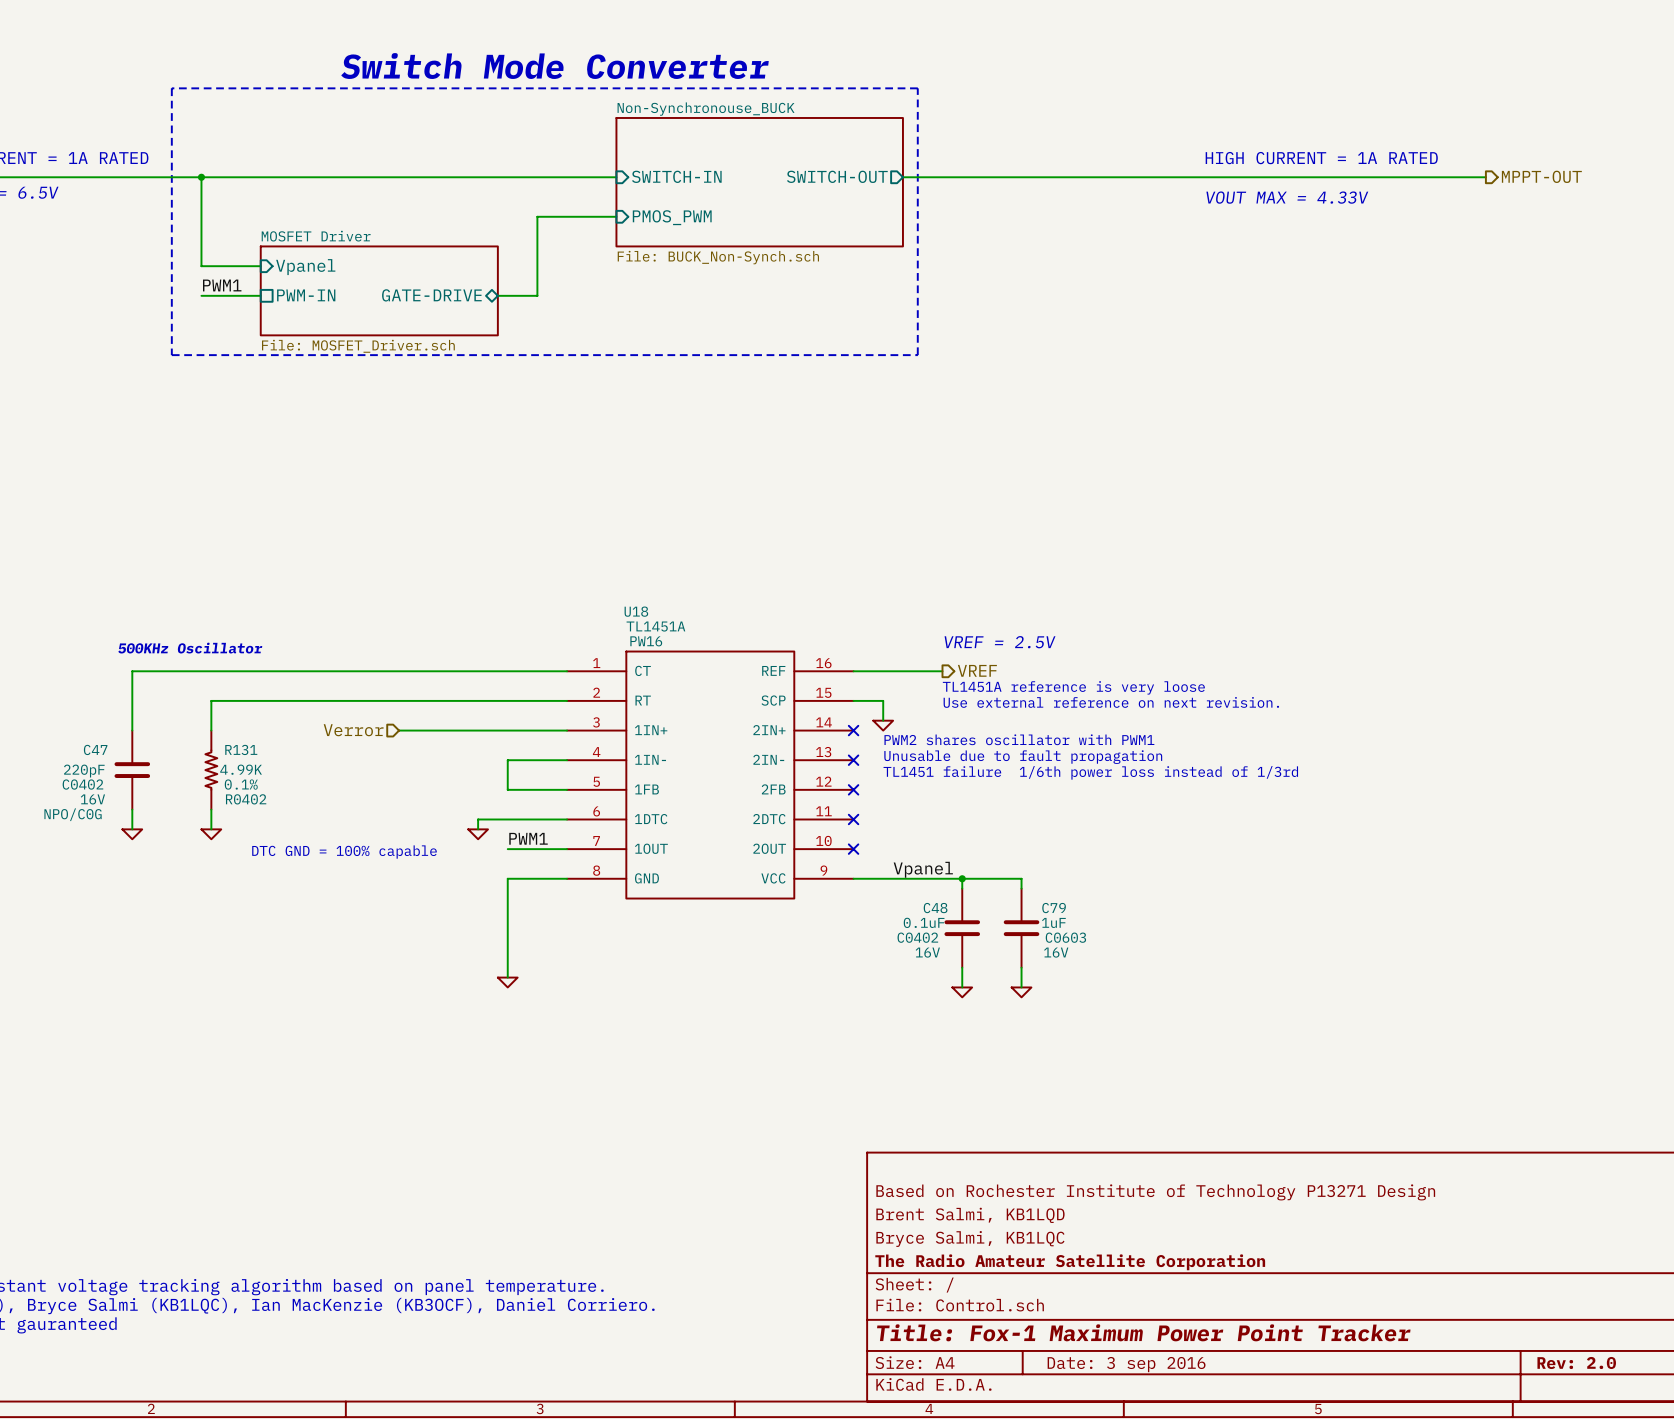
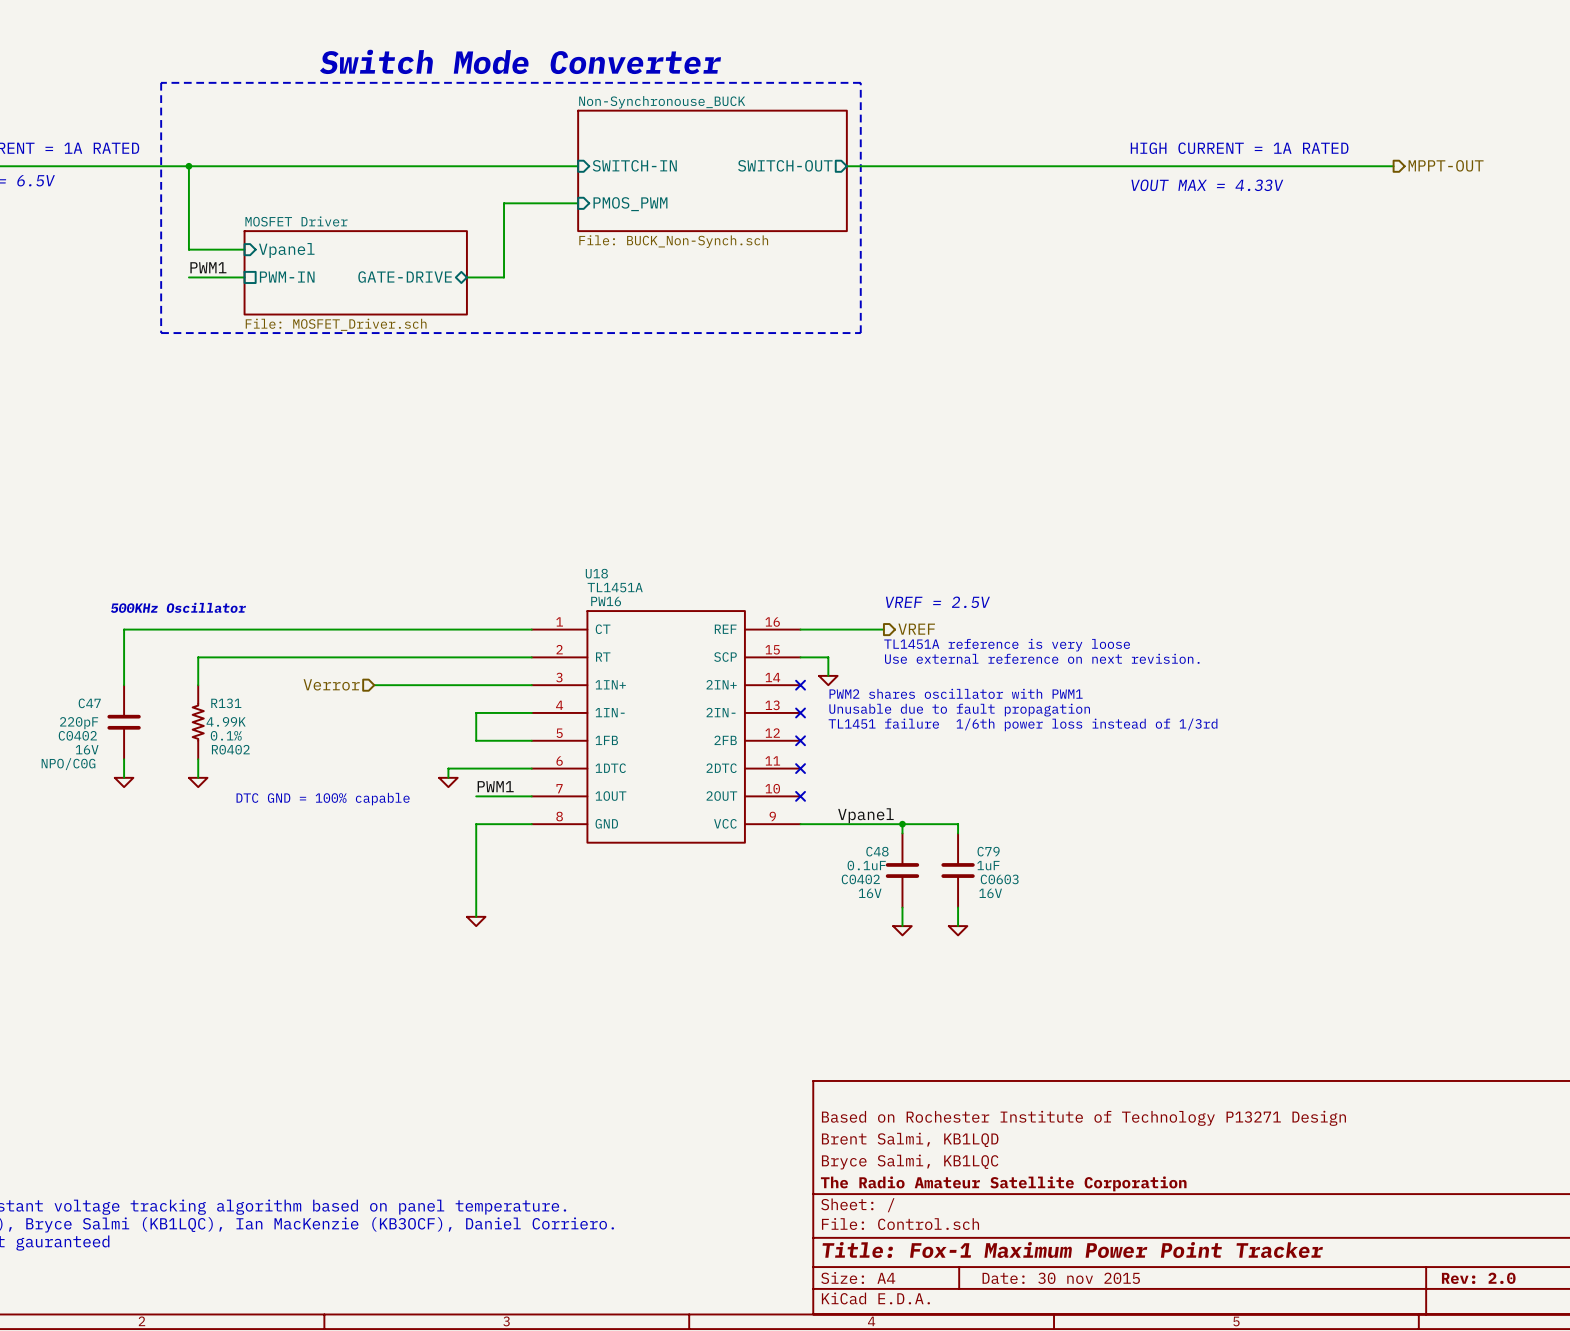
title block: Date: 3 sep 2016 (1126, 1364) -> Date: 30 nov 2015 (1061, 1278)

